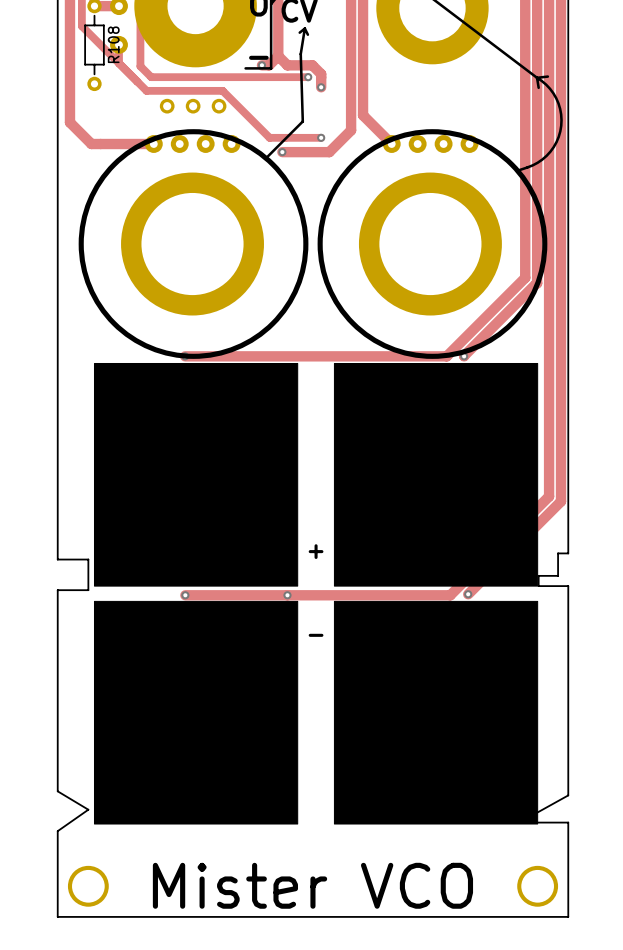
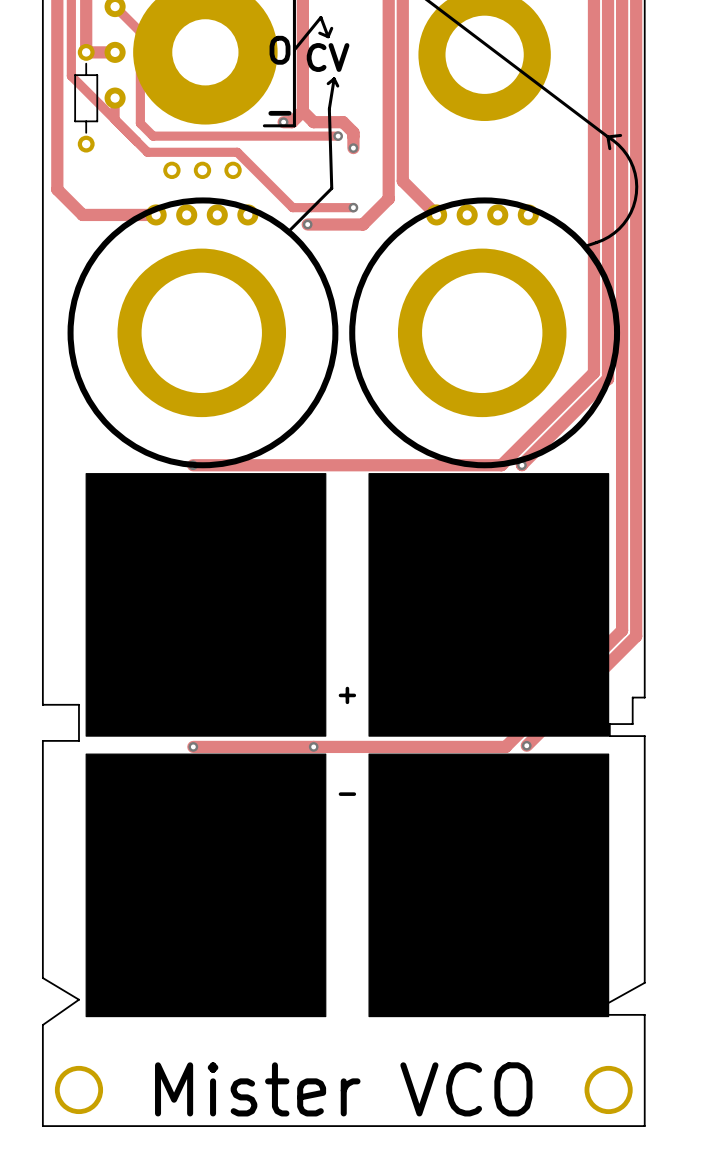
R108 name: R108 (113, 44) -> none

